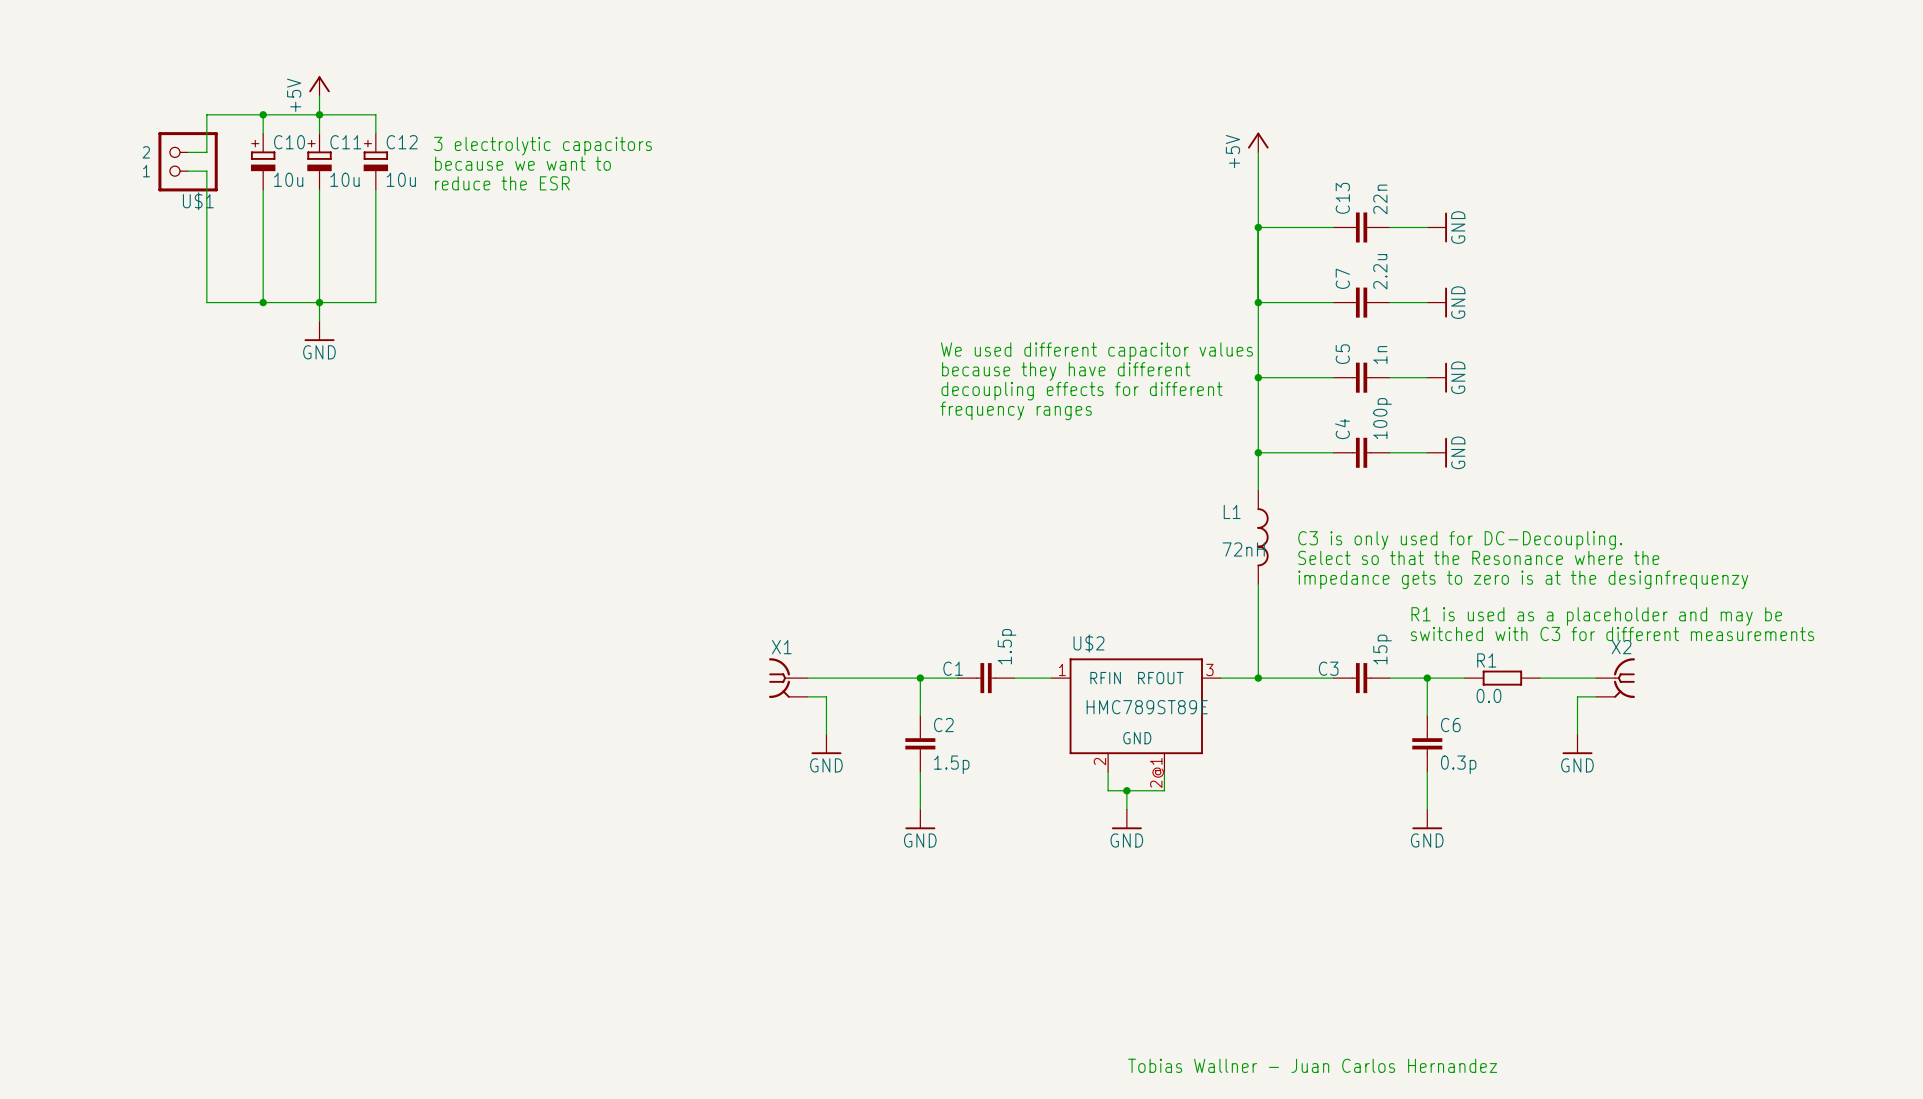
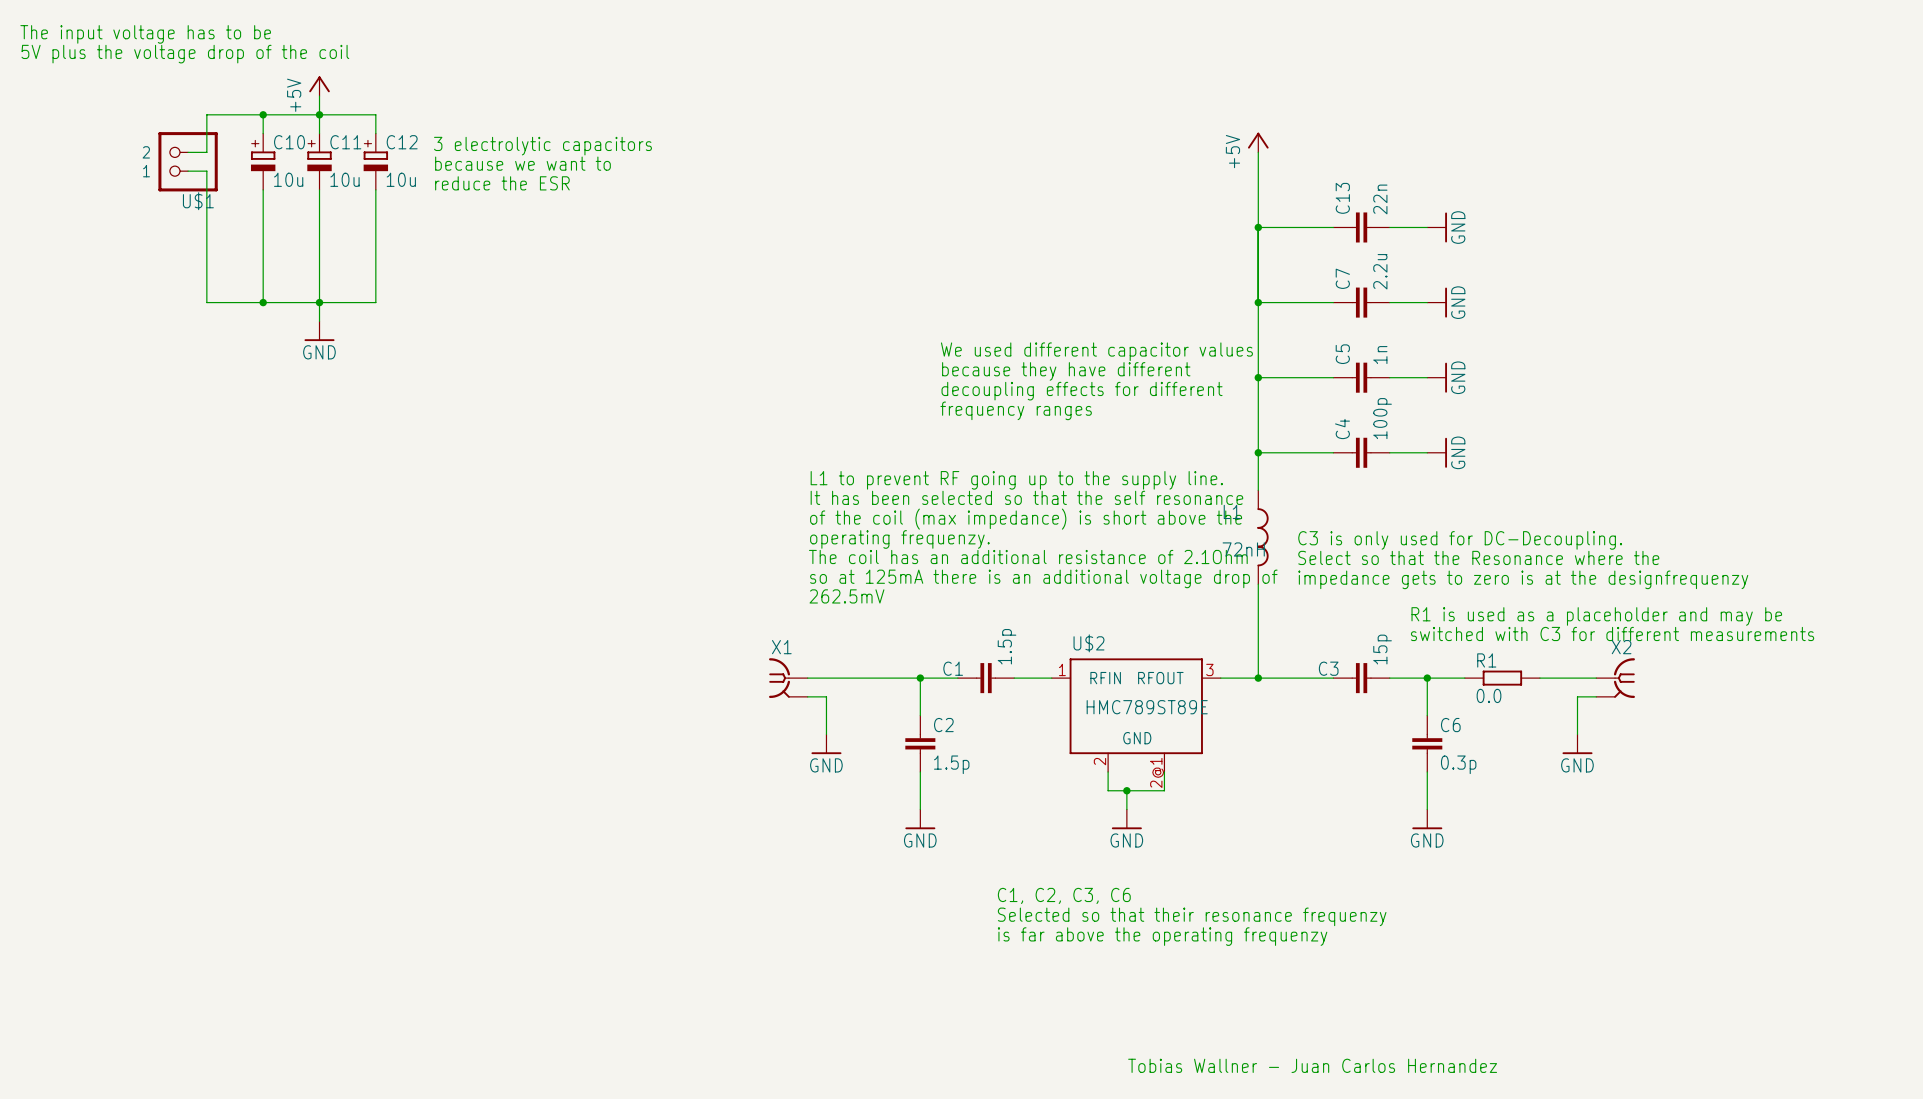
text: none -> The input voltage has to be (145, 34)
text: none -> 5V plus the voltage drop of the coil (185, 54)
text: none -> L1 to prevent RF going up to the supply line. (1016, 480)
text: none -> It has been selected so that the self resonance (1026, 497)
text: none -> of the coil (max impedance) is short above the (1026, 519)
text: none -> operating frequenzy. (899, 539)
text: none -> The coil has an additional resistance of 2.1Ohm (1028, 556)
text: none -> so at 125mA there is an additional voltage drop of (1043, 578)
text: none -> 262.5mV (846, 596)
text: none -> C1, C2, C3, C6 (1064, 895)
text: none -> Selected so that their resonance frequenzy (1192, 916)
text: none -> is far above the operating frequenzy (1162, 936)

